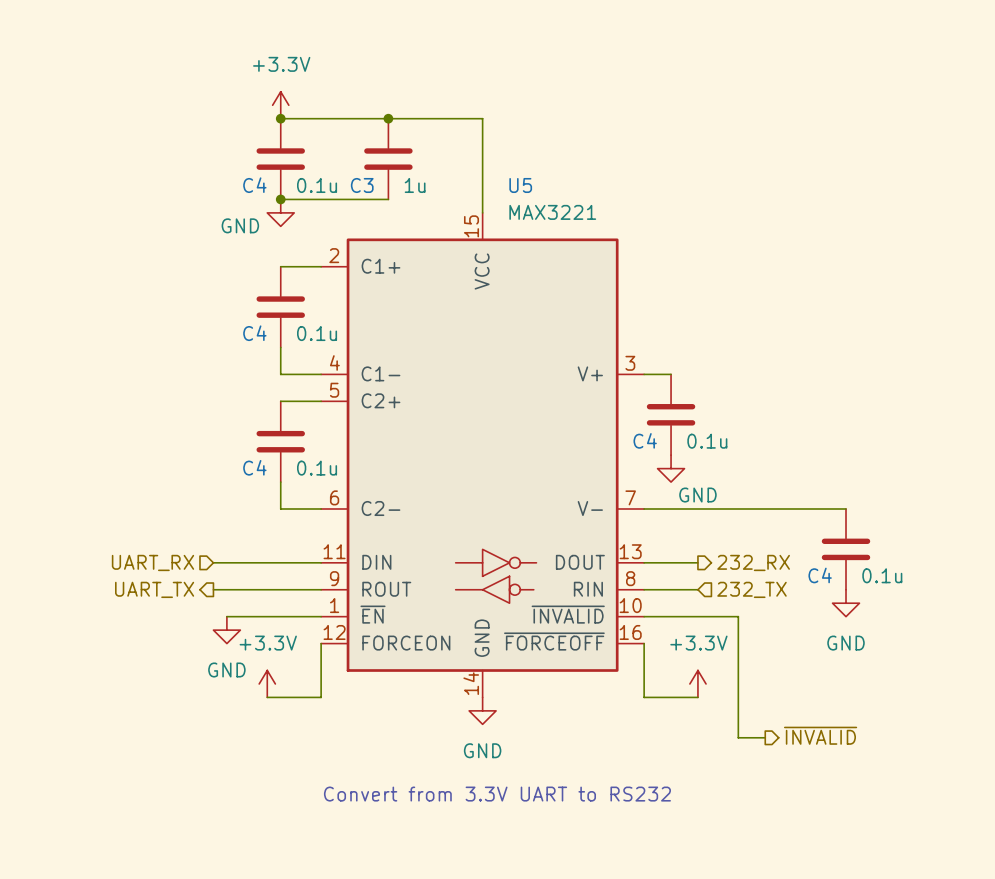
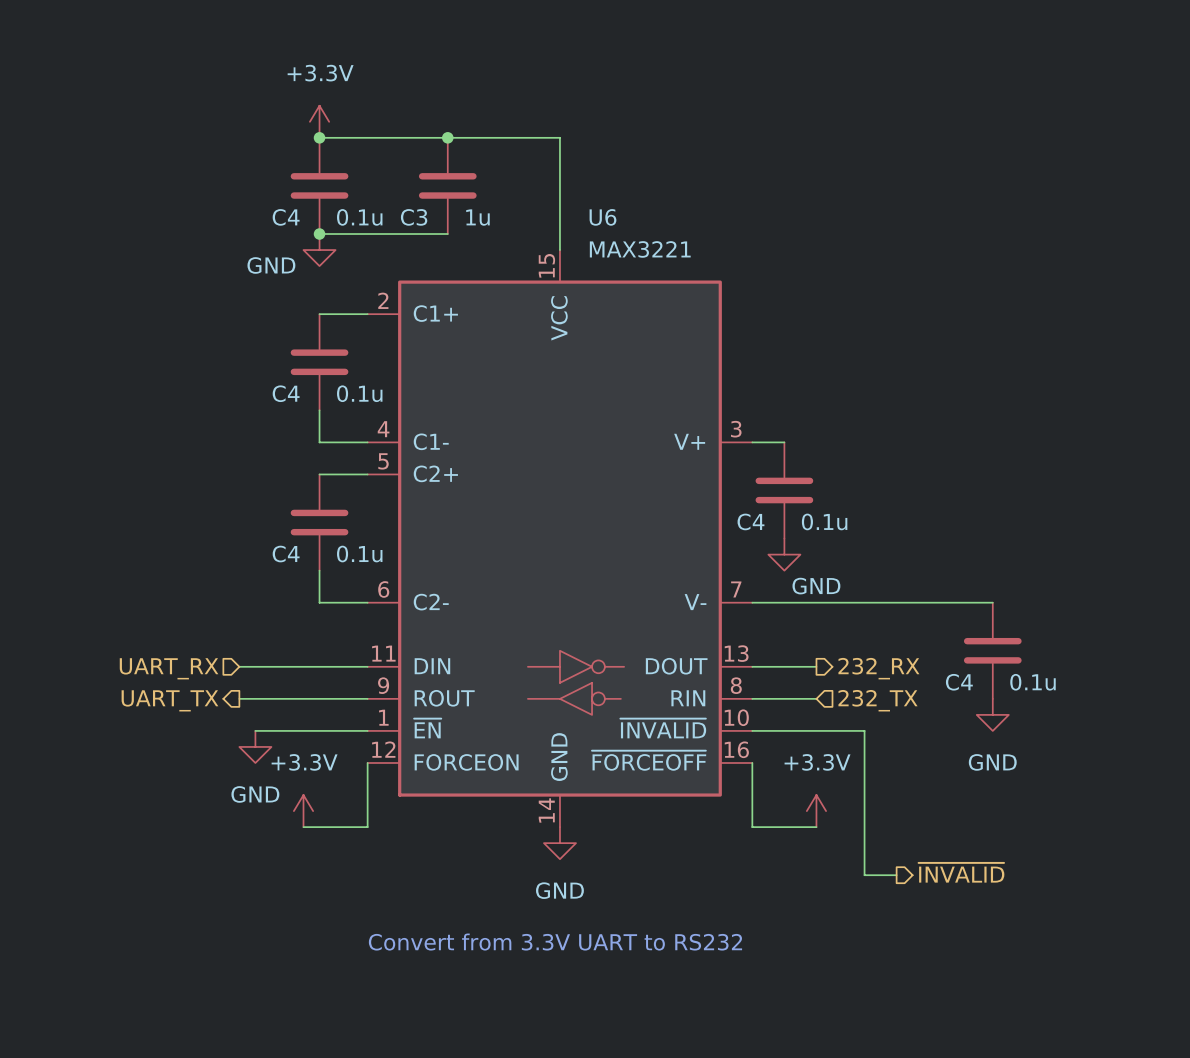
U5 name: U5 (520, 185) -> U6 (602, 217)

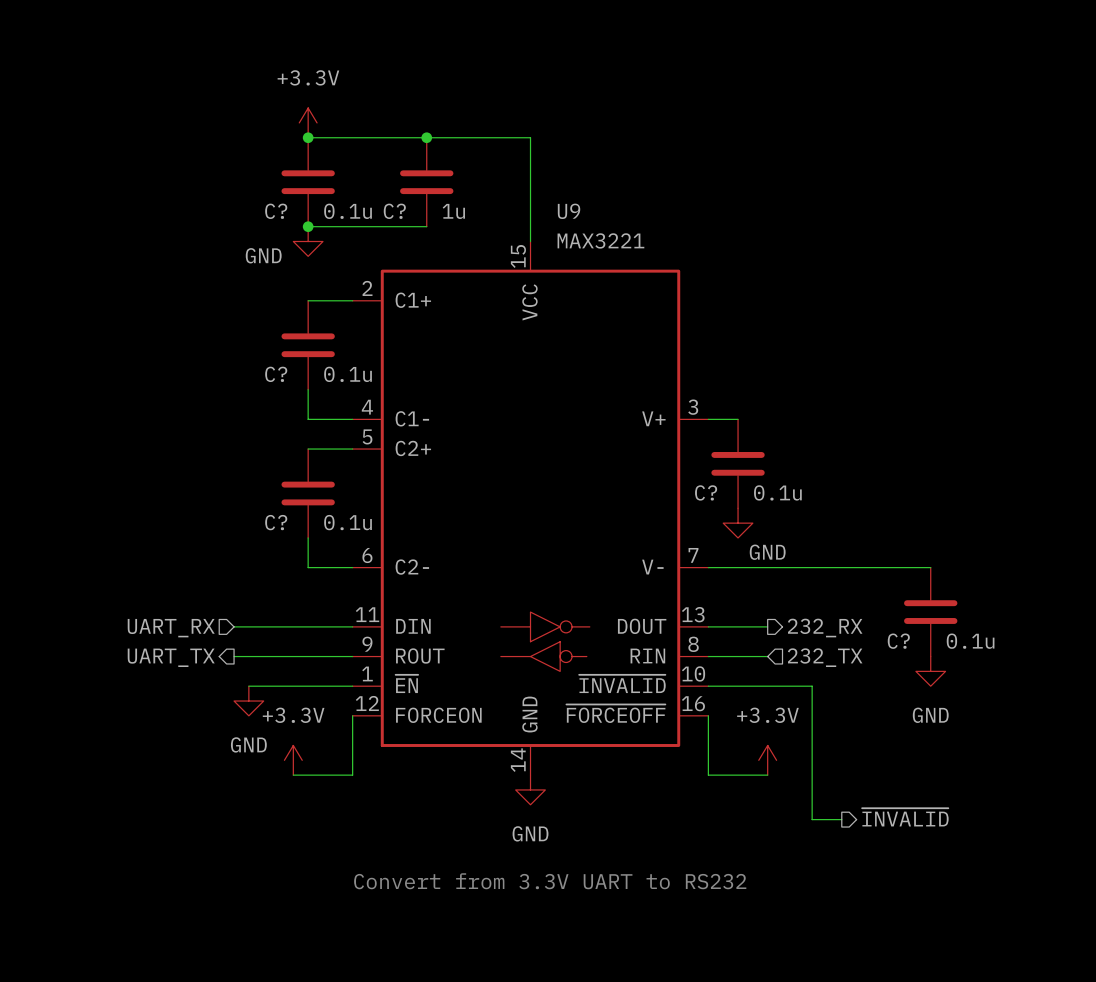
C4 name: C4 (286, 217) -> C? (276, 211)
C3 name: C3 (414, 217) -> C? (394, 211)
U6 name: U6 (602, 217) -> U9 (569, 211)
C4 name: C4 (286, 393) -> C? (276, 374)
C4 name: C4 (750, 521) -> C? (706, 492)
C4 name: C4 (286, 554) -> C? (276, 522)
C4 name: C4 (959, 682) -> C? (898, 641)

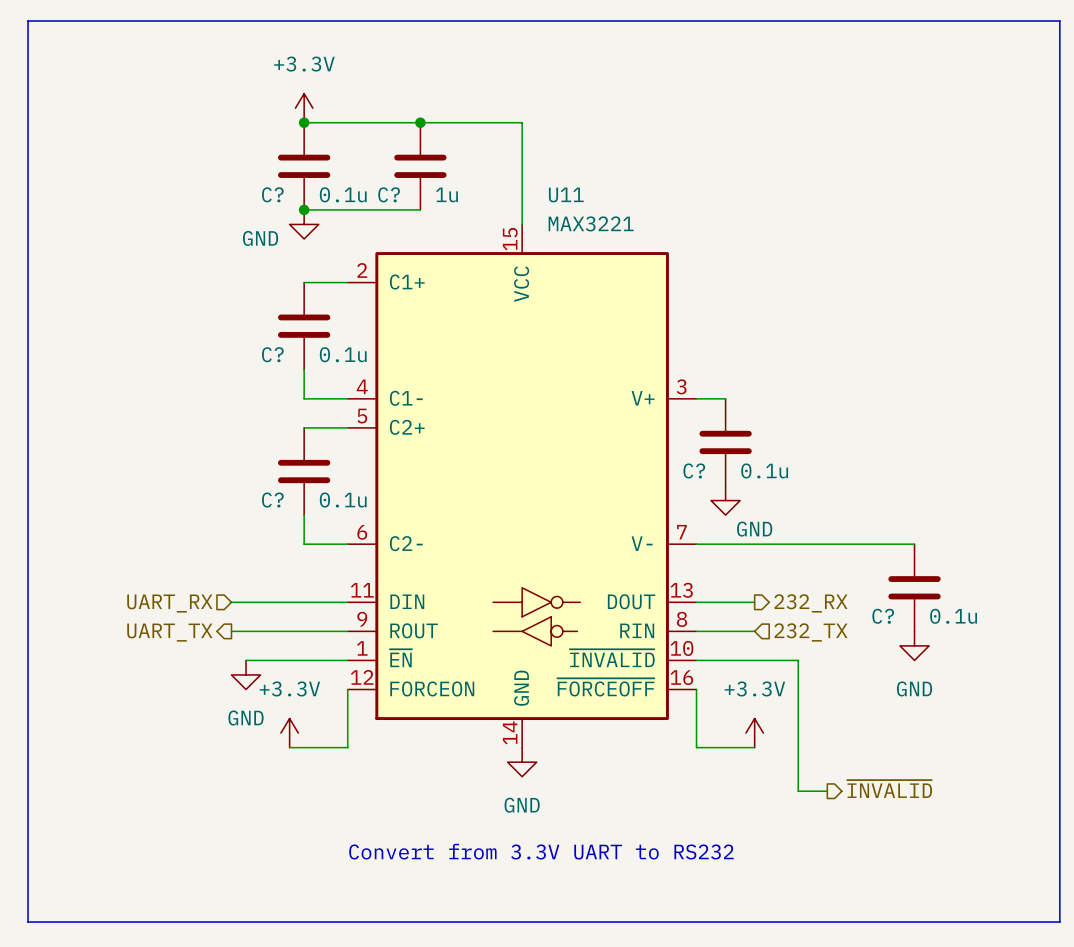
line: none -> (28, 21) (1059, 21) (1059, 922) (28, 922) (28, 21)
U9 name: U9 (569, 211) -> U11 (566, 194)

